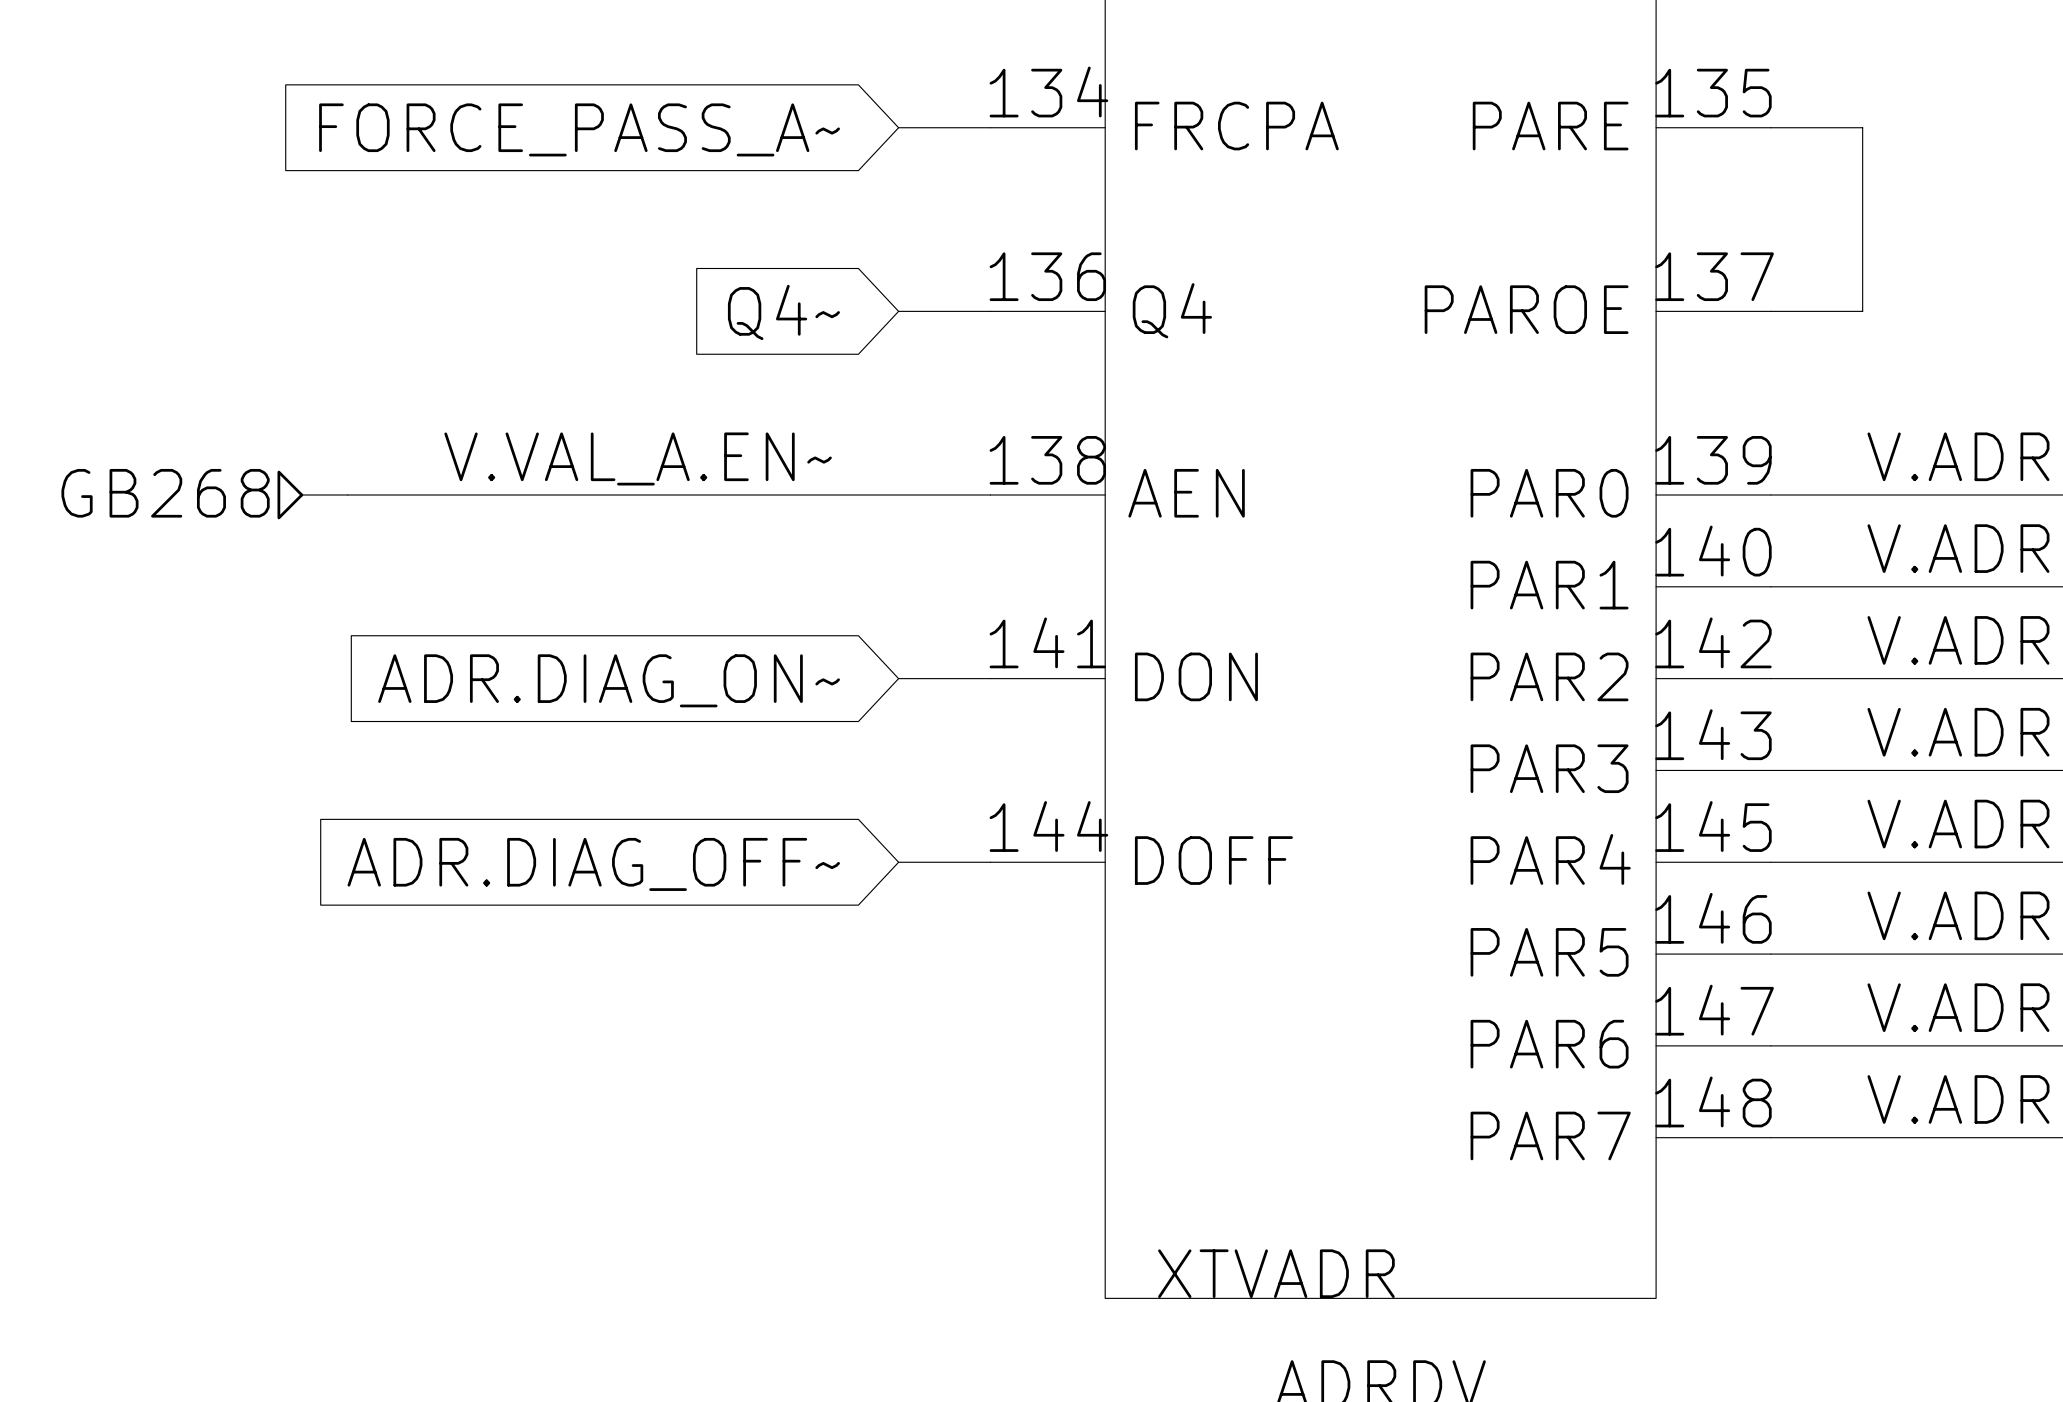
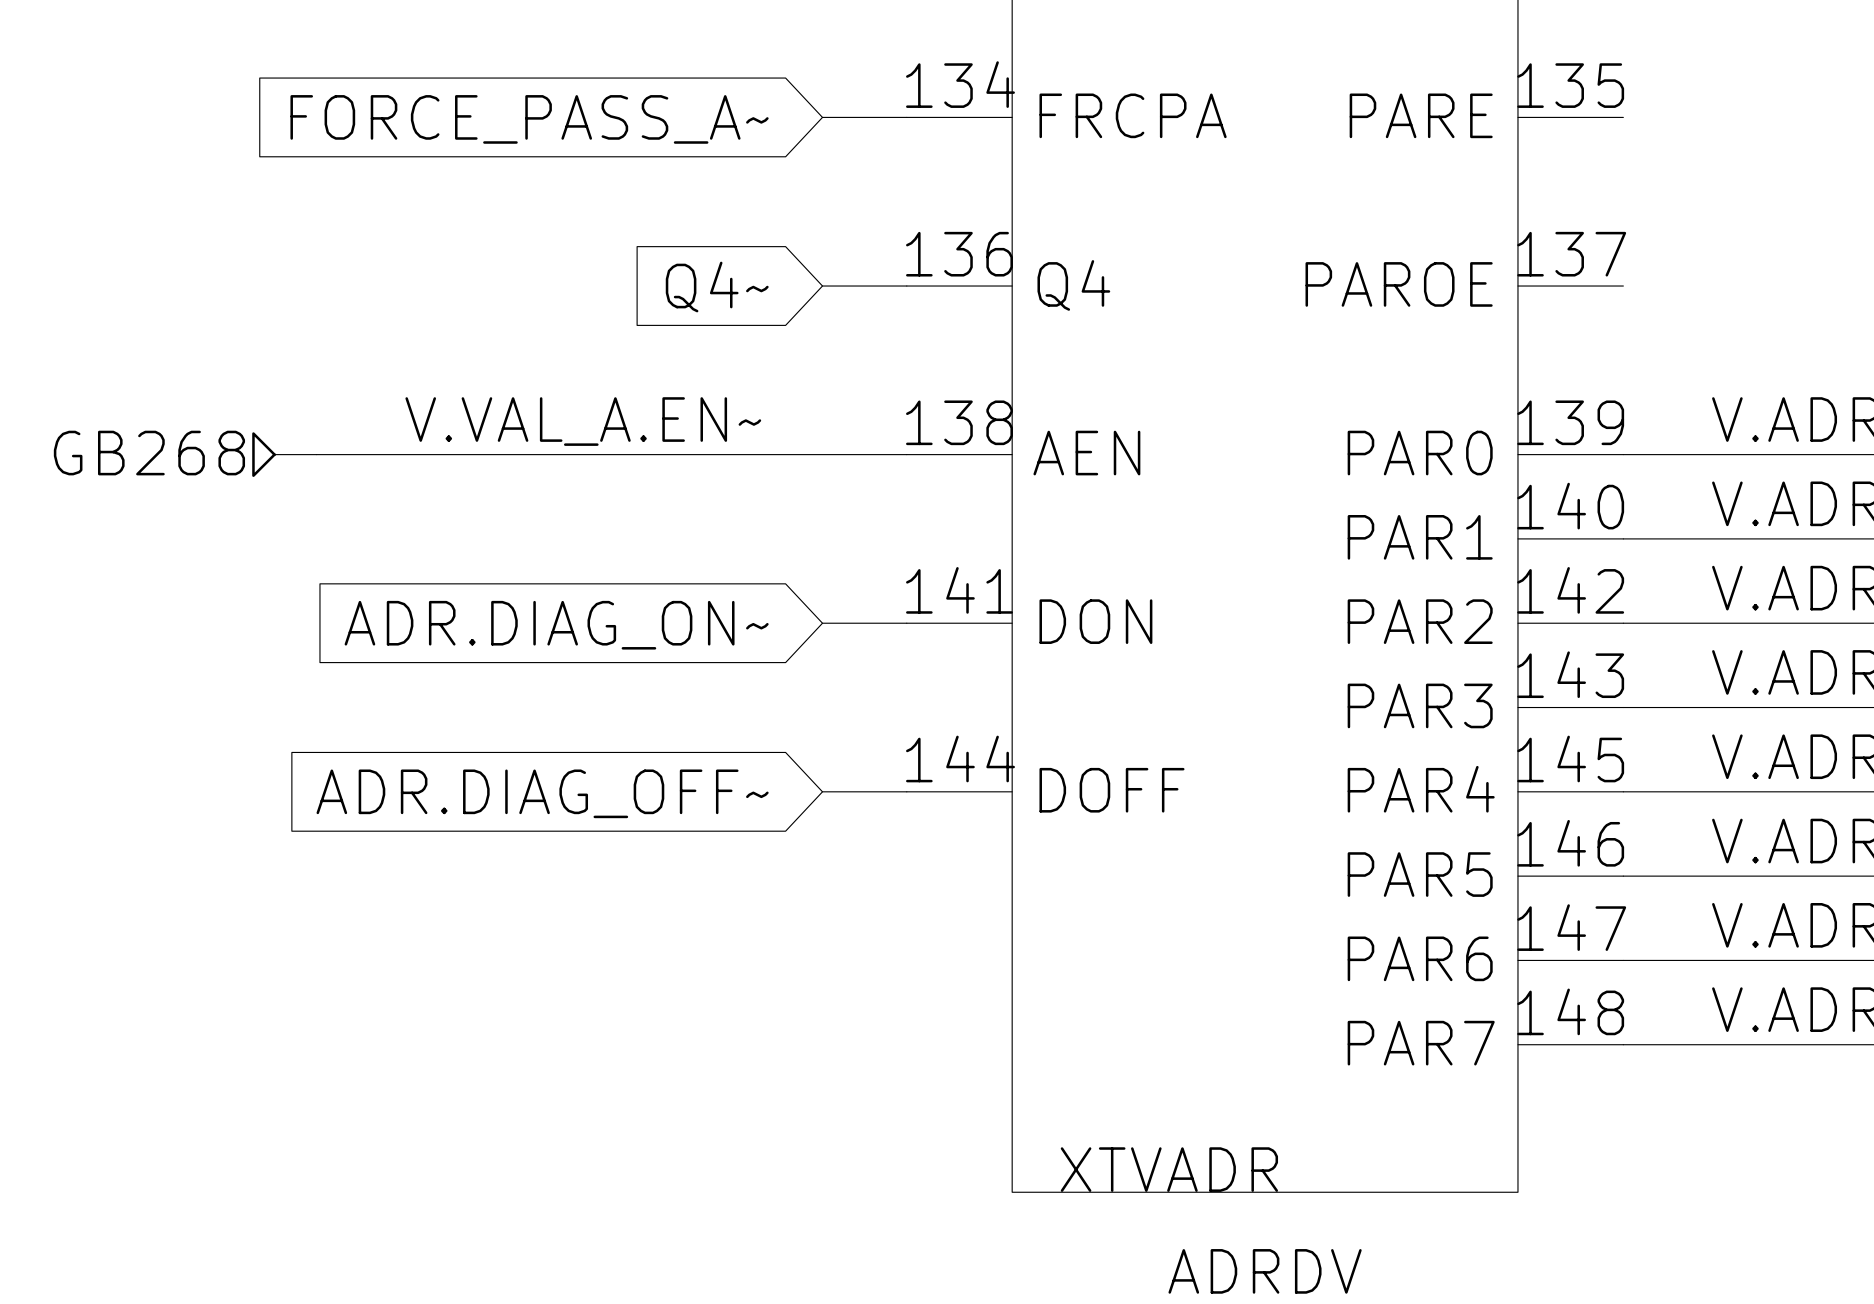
wire: (1770, 127) (1862, 127) (1862, 311) (1770, 311) -> none

